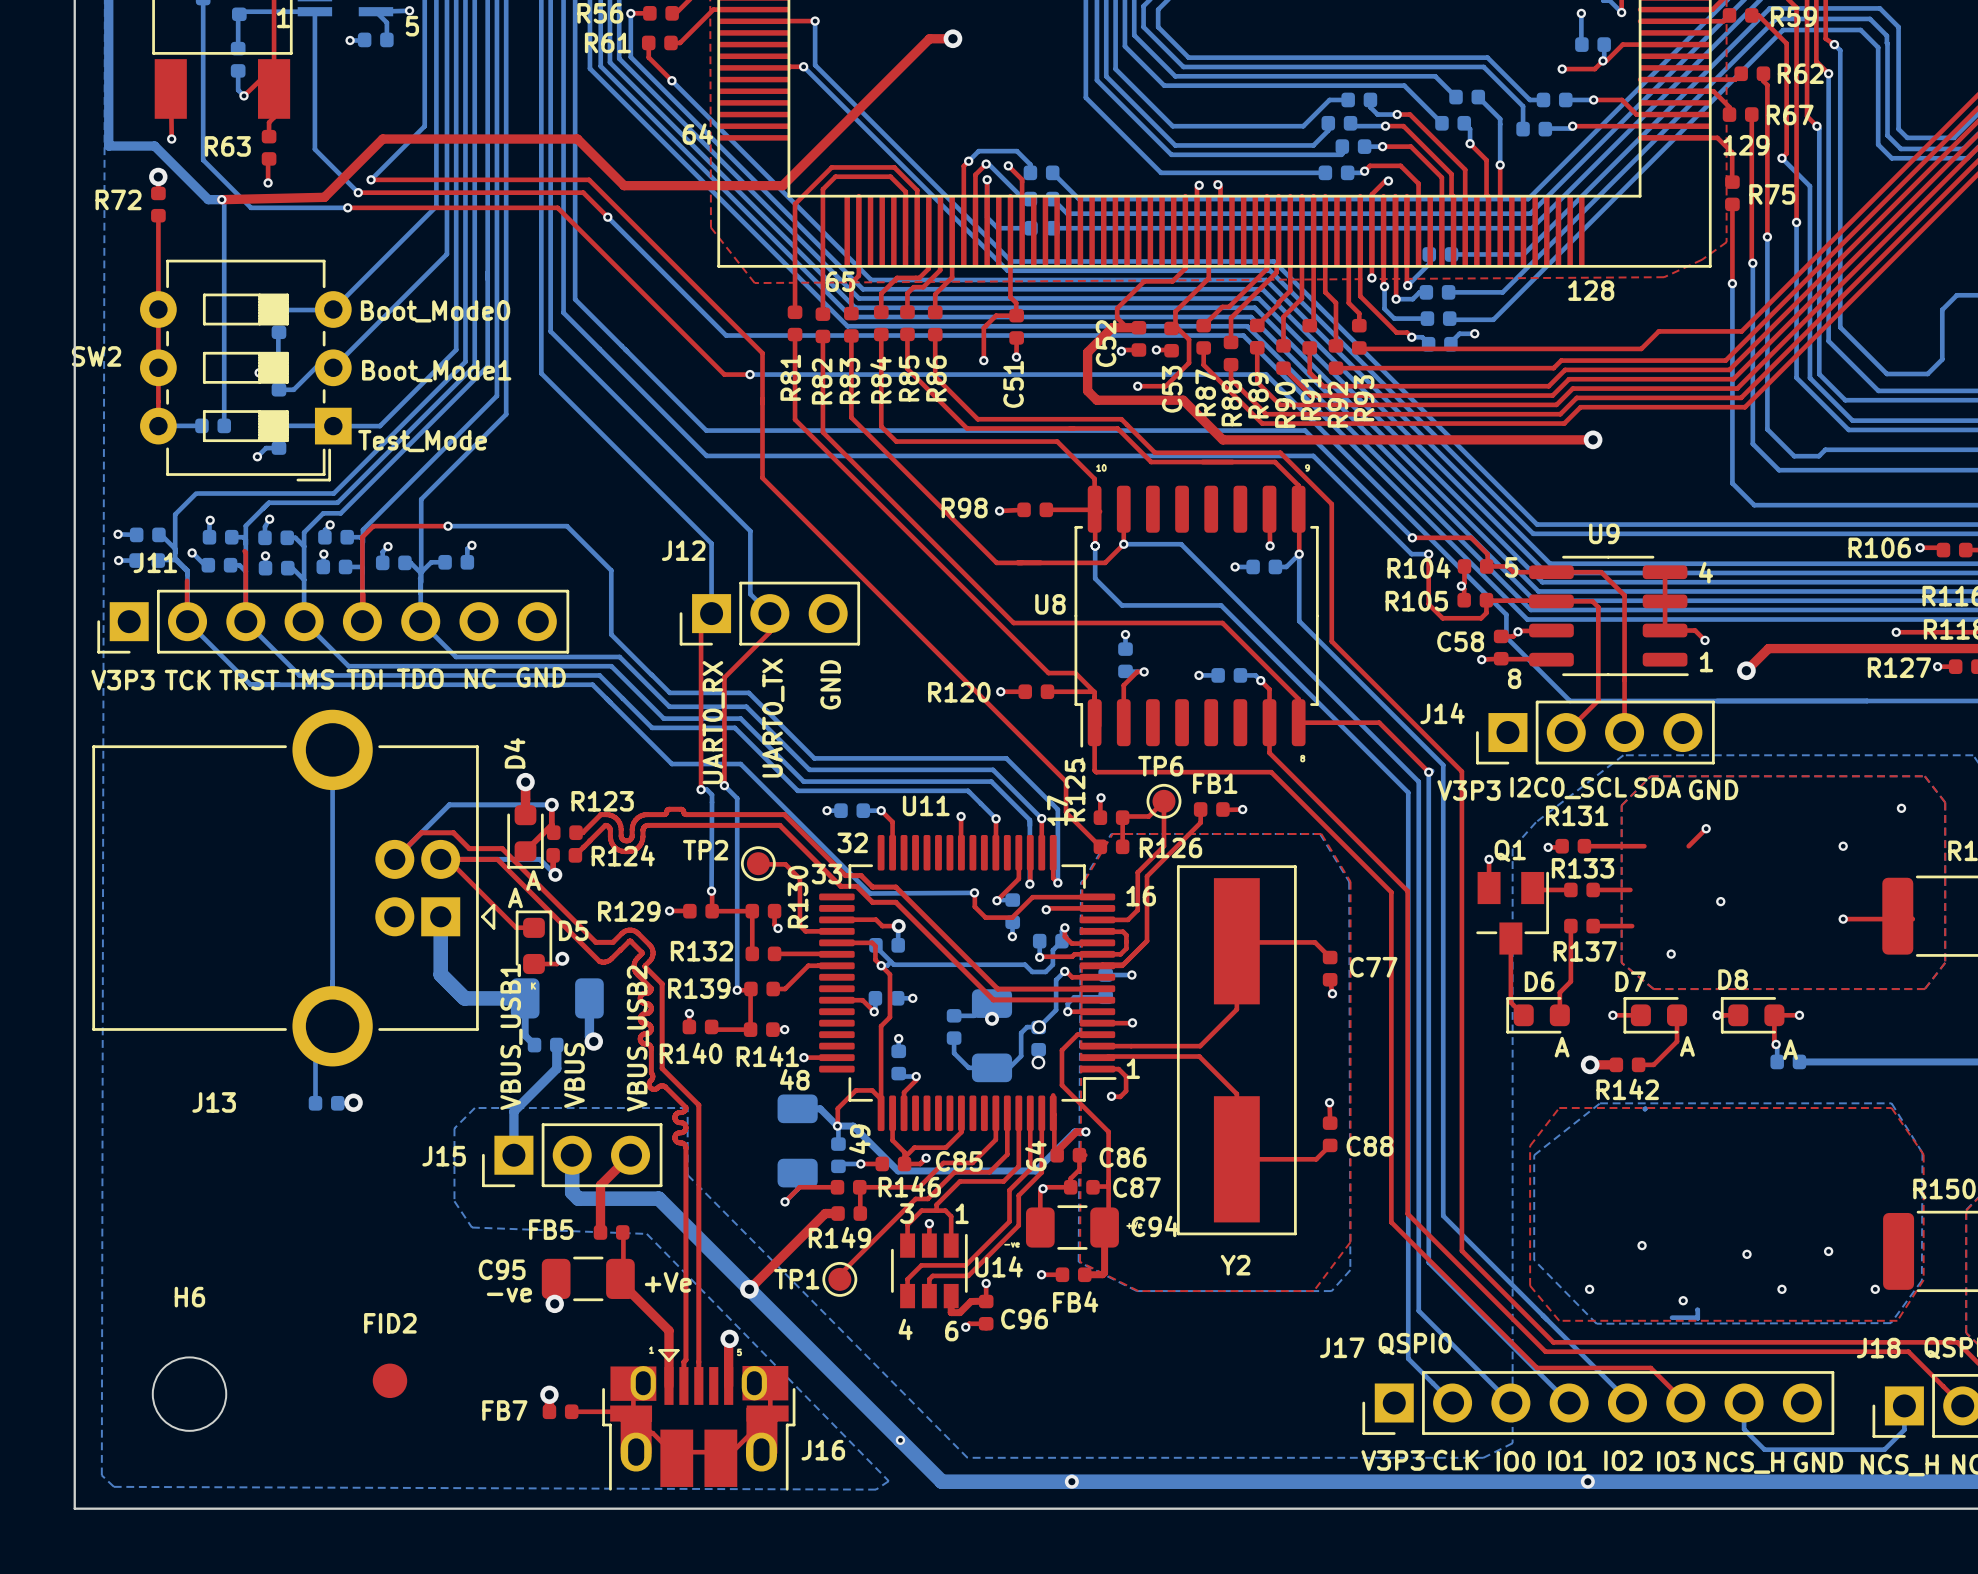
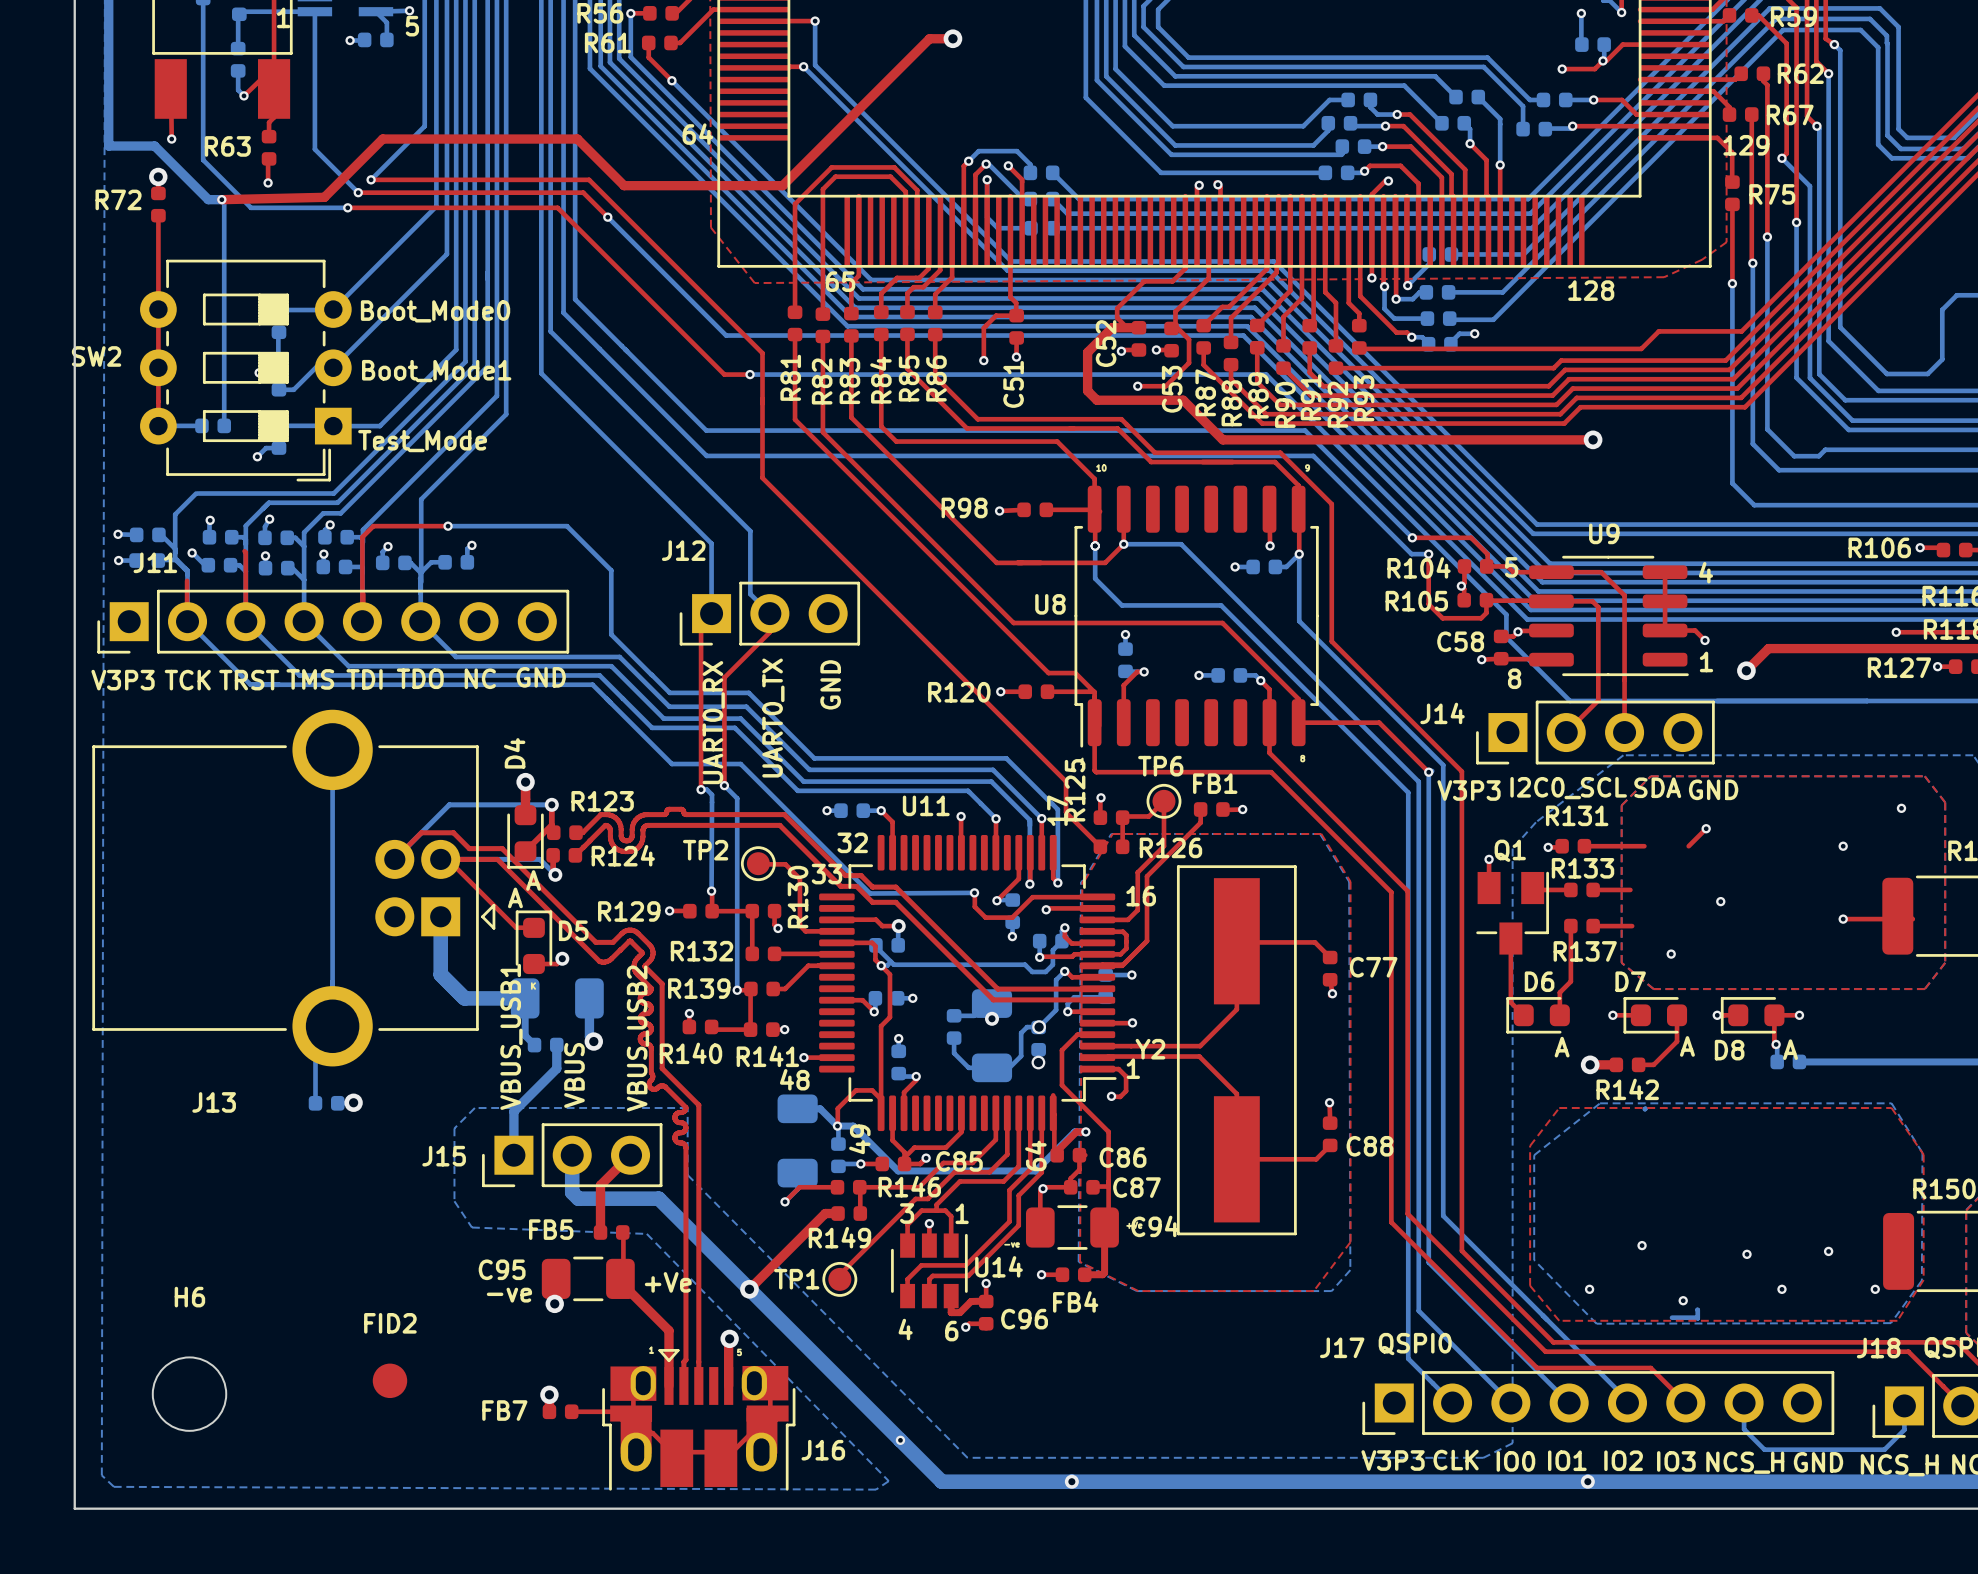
D8 name position: D8 (1733, 979) -> D8 (1729, 1050)
Y2 name position: Y2 (1235, 1265) -> Y2 (1150, 1049)

